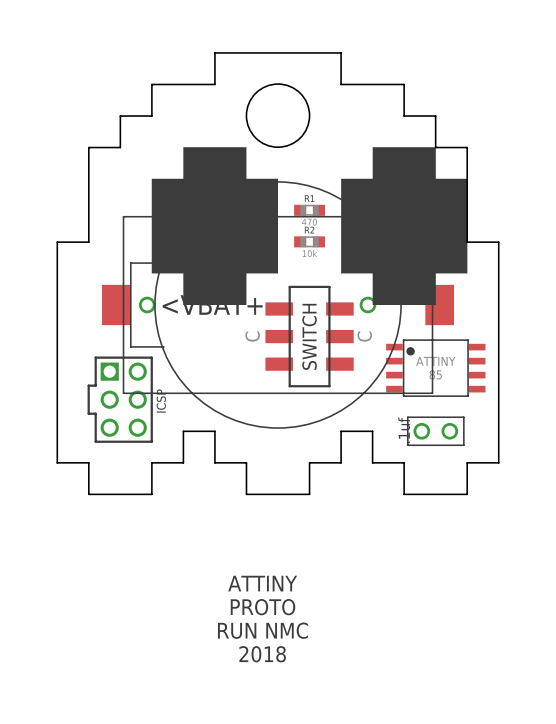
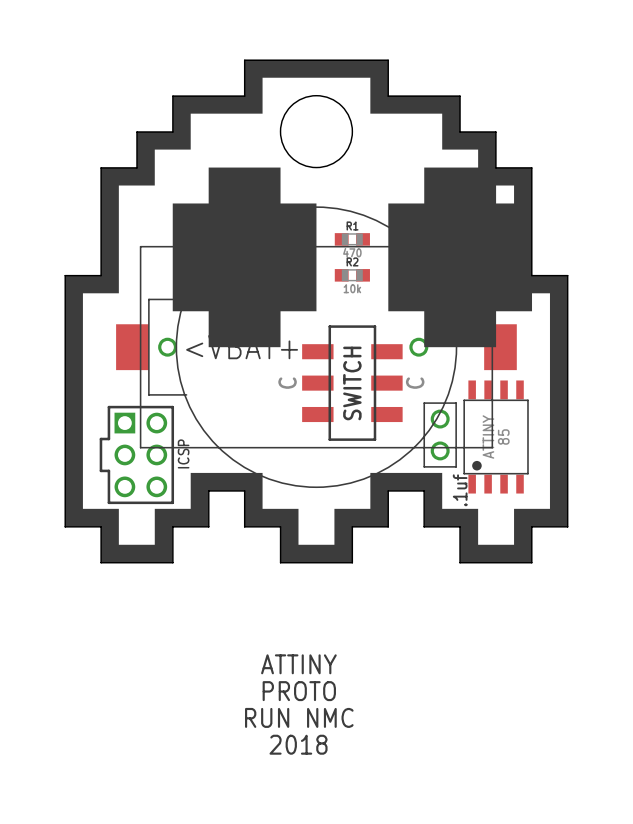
drawing: none -> [64, 59, 568, 563]
part rotation: 0° (435, 368) -> 90° counterclockwise (496, 437)
part rotation: 0° (435, 431) -> 90° clockwise (440, 434)
part position: (435, 431) -> (440, 434)

